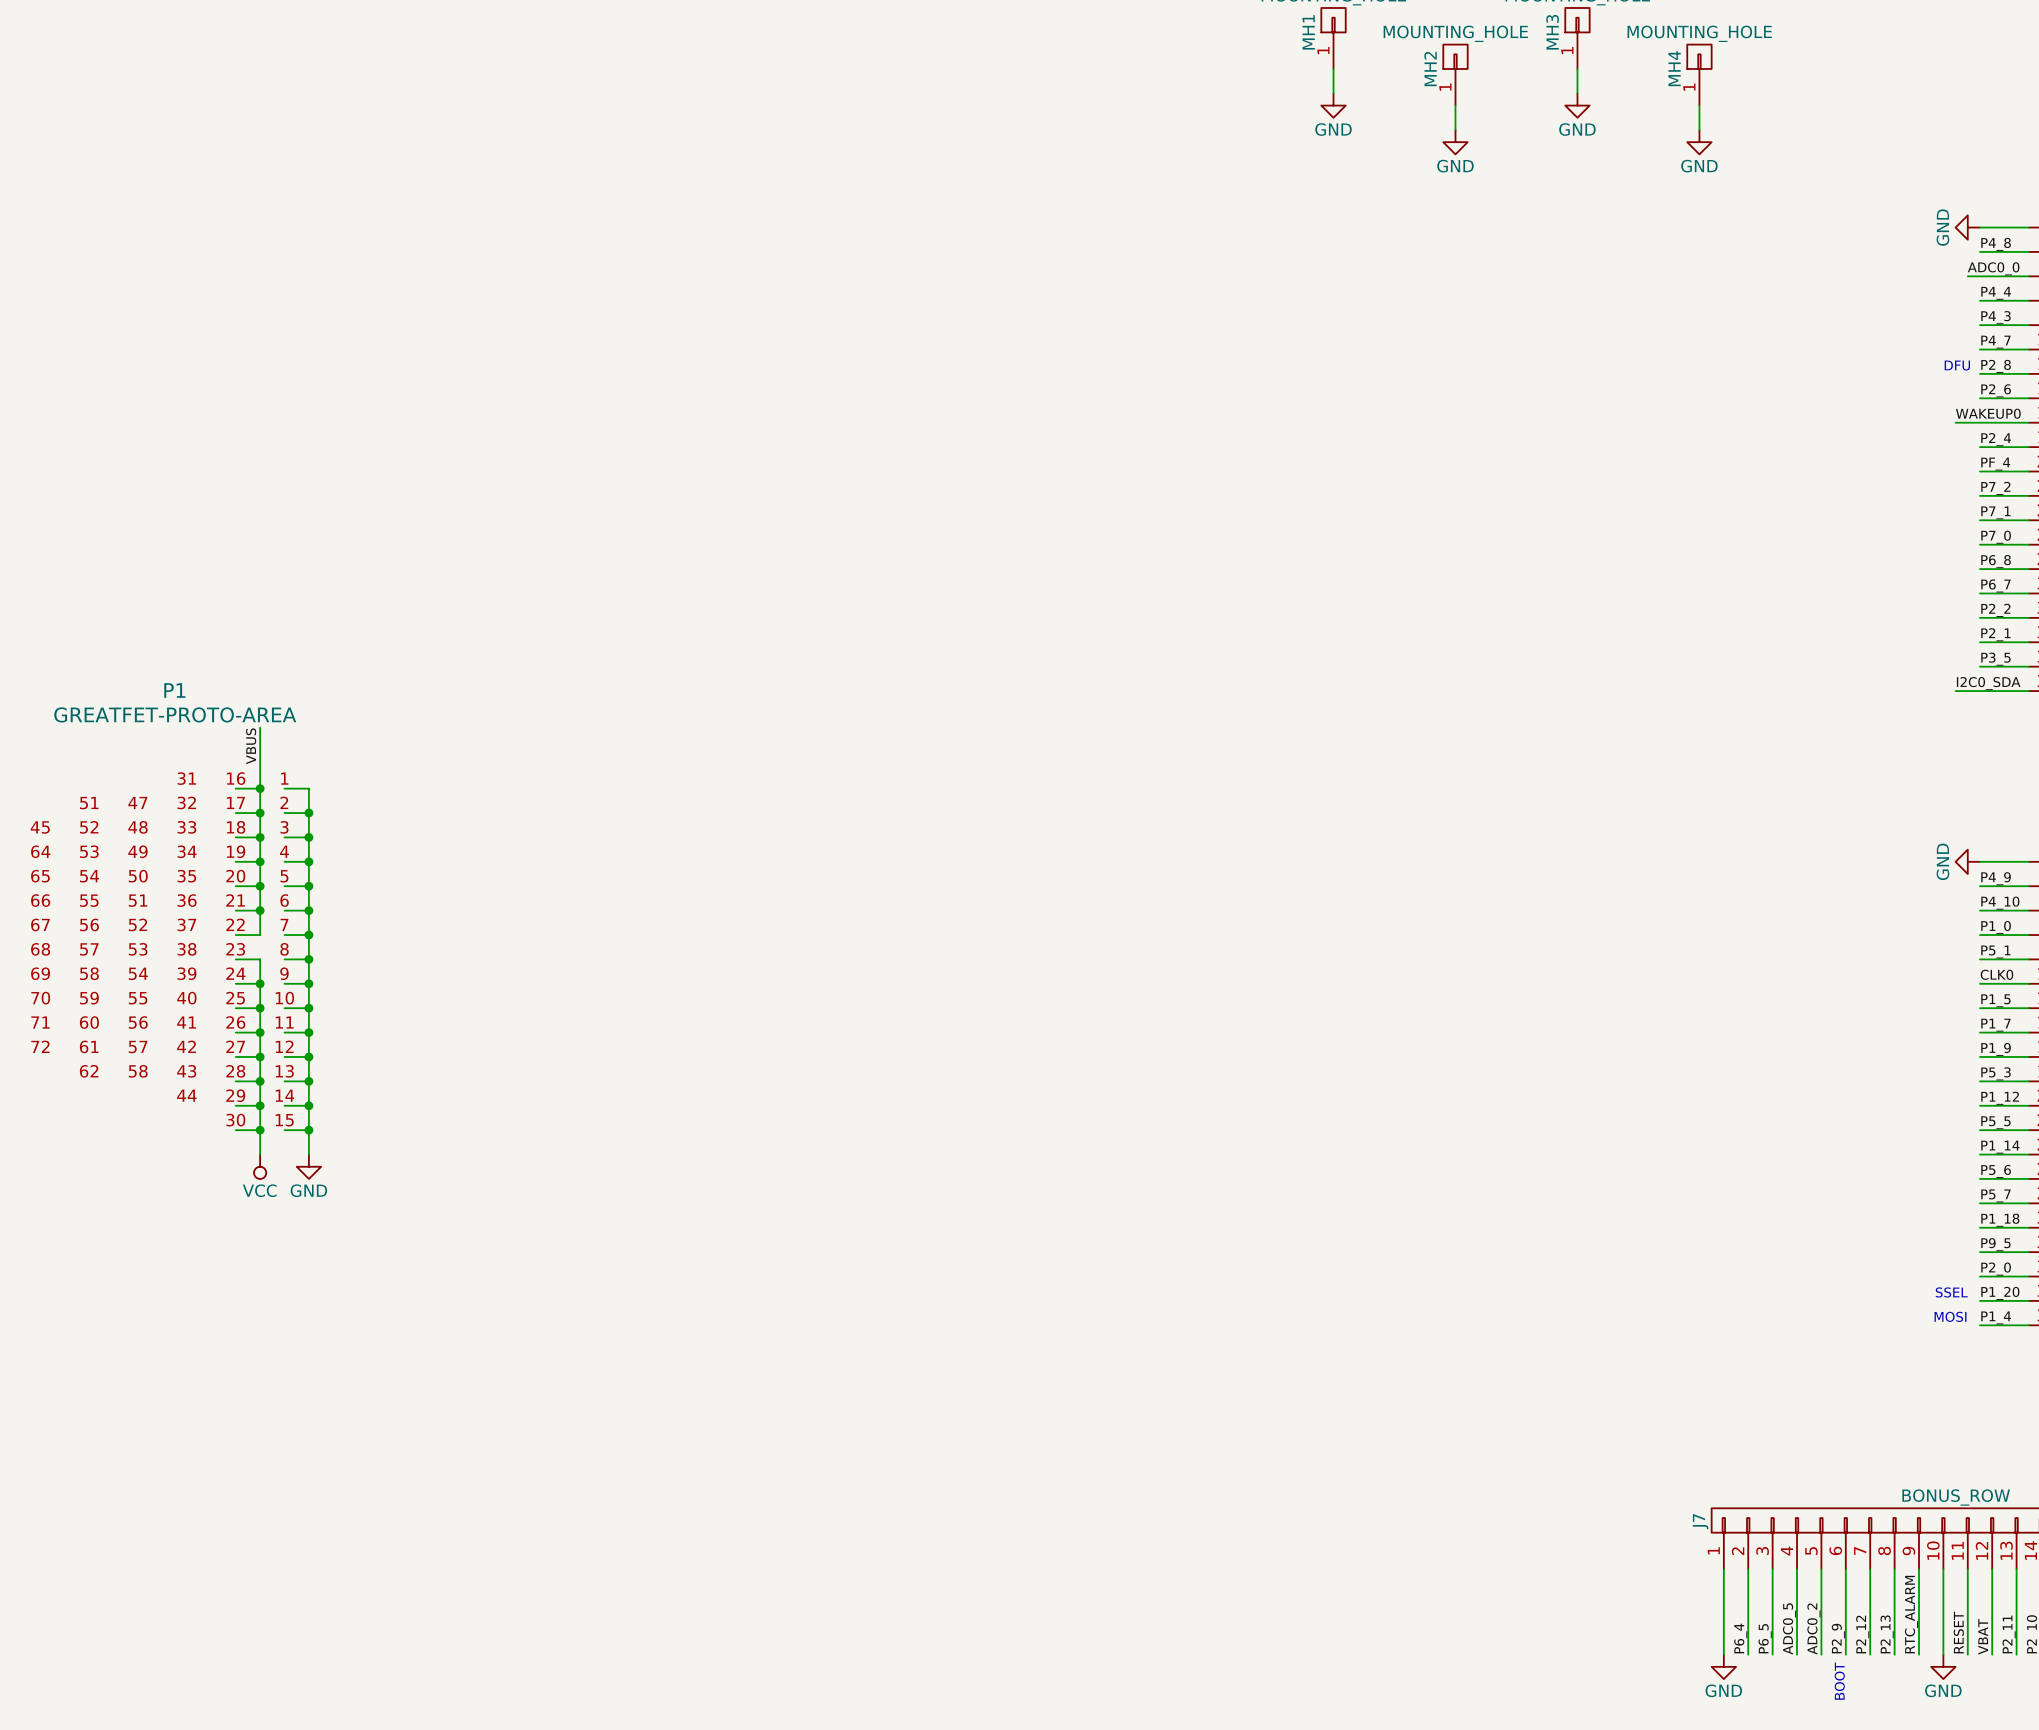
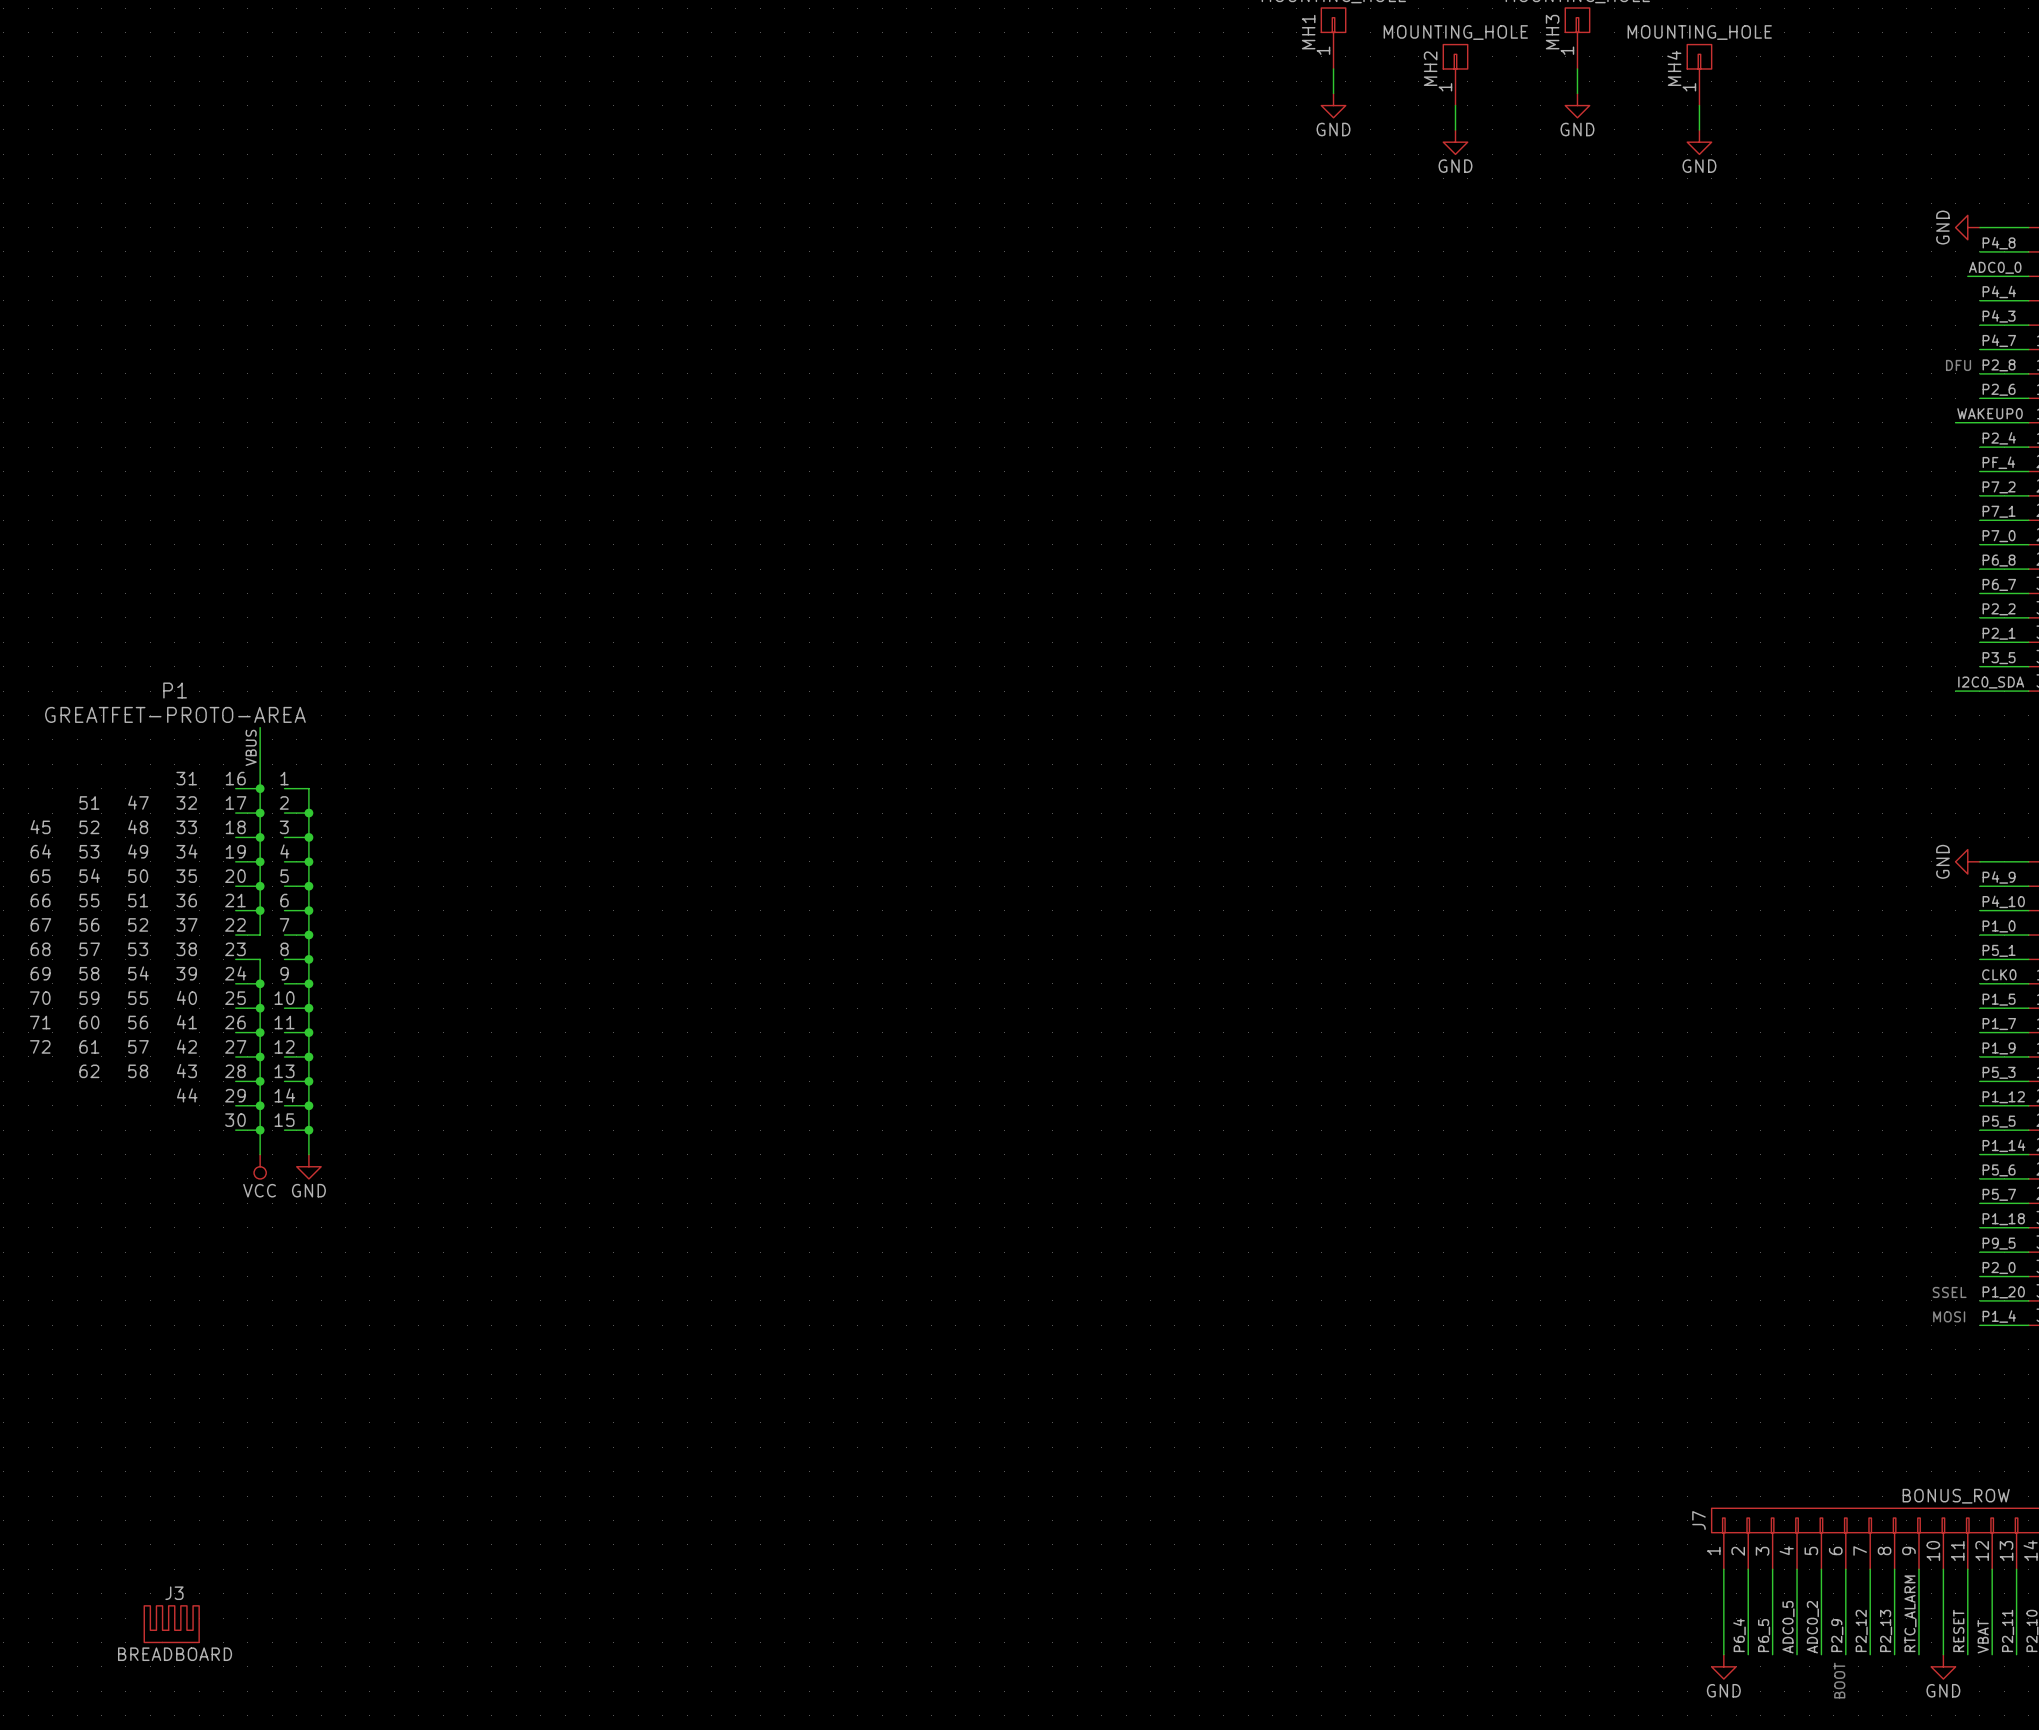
J3: none -> BREADBOARD (171, 1624)

